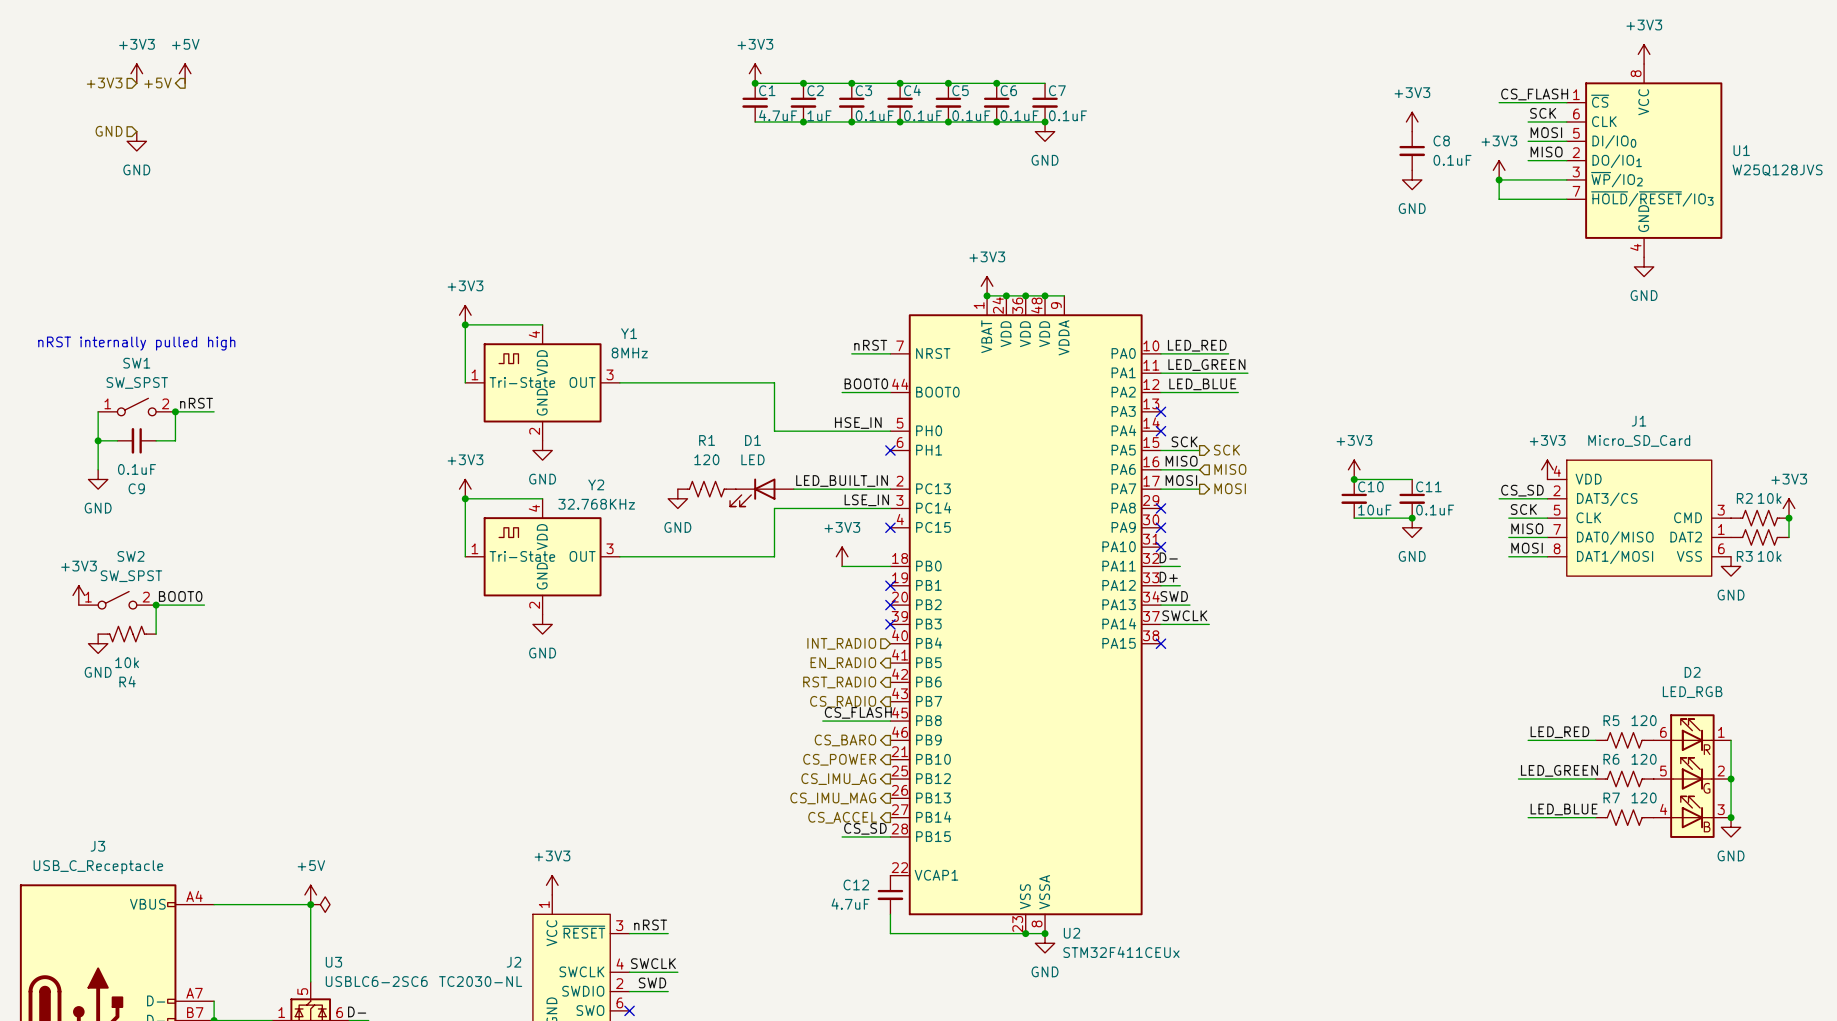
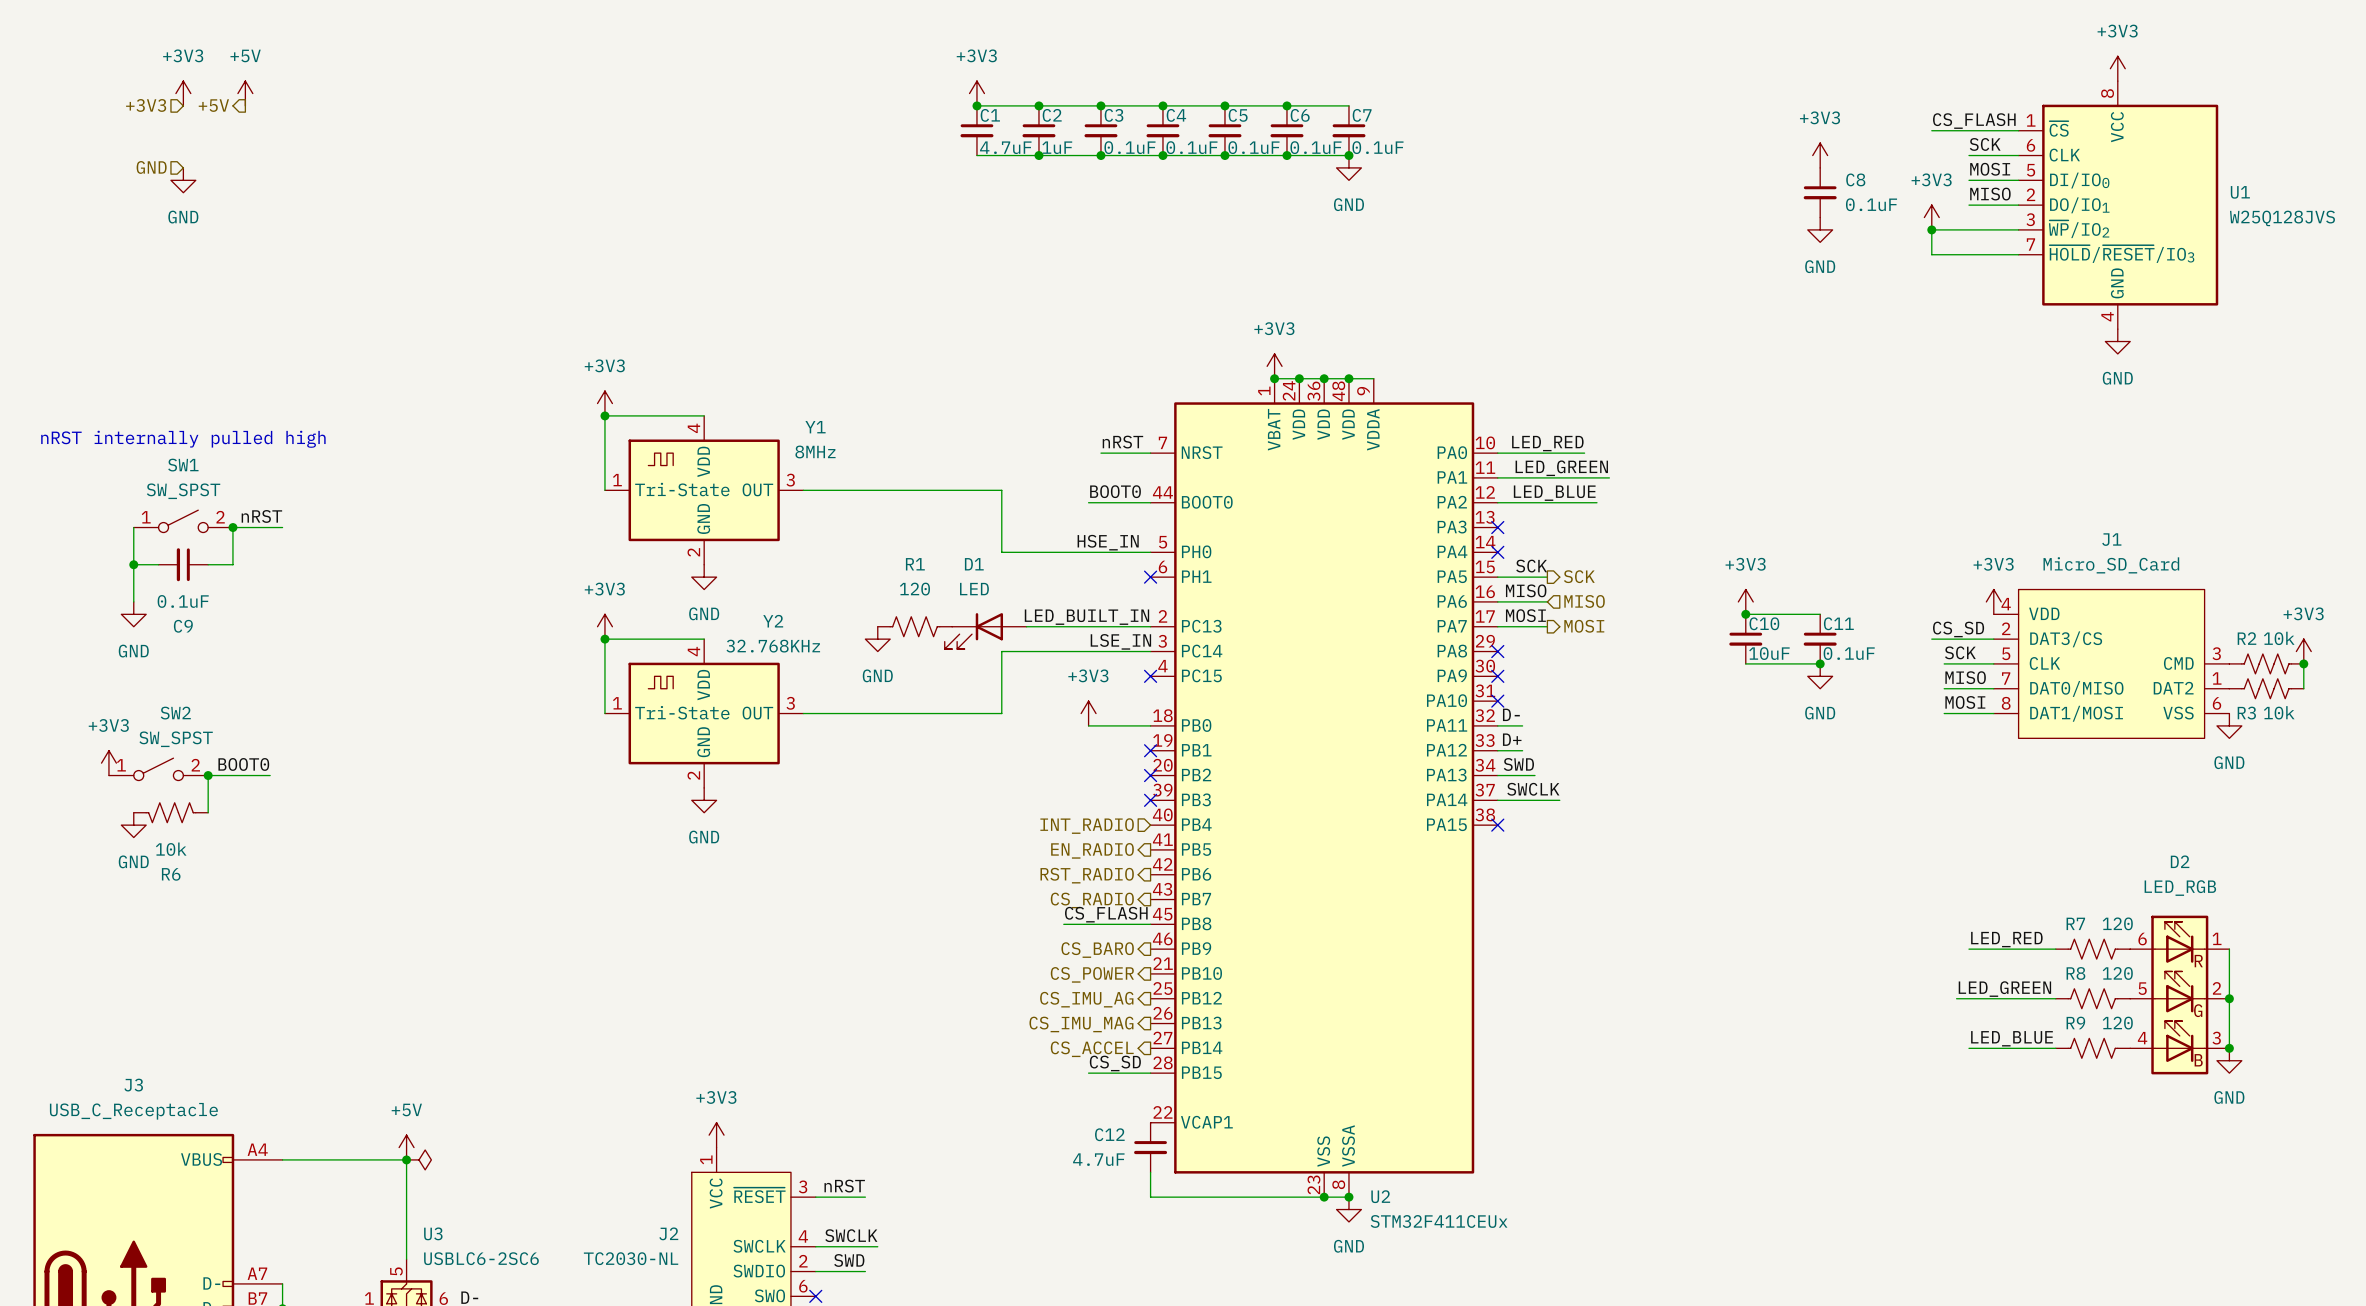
R4 name: R4 (127, 681) -> R6 (171, 874)
R5 name: R5 (1611, 720) -> R7 (2075, 923)
R6 name: R6 (1611, 759) -> R8 (2075, 973)
R7 name: R7 (1611, 797) -> R9 (2075, 1022)

